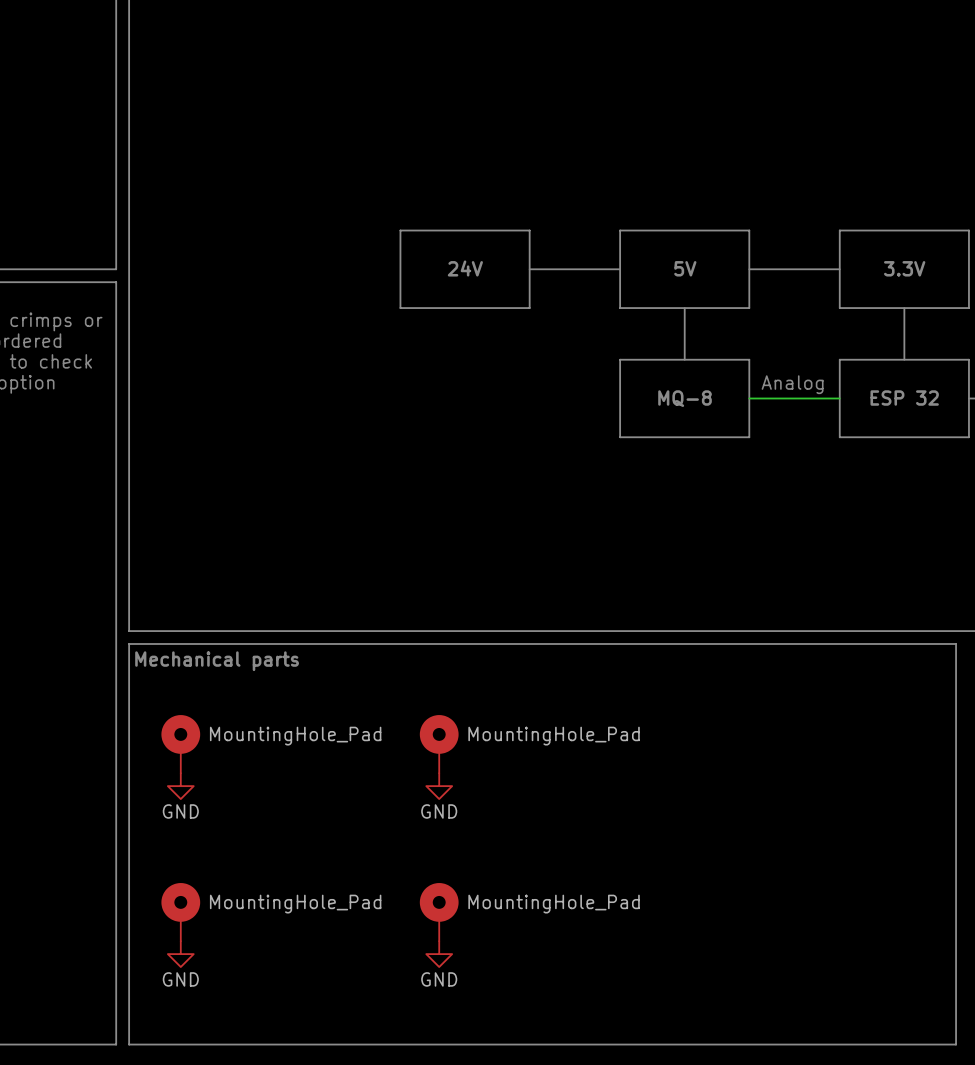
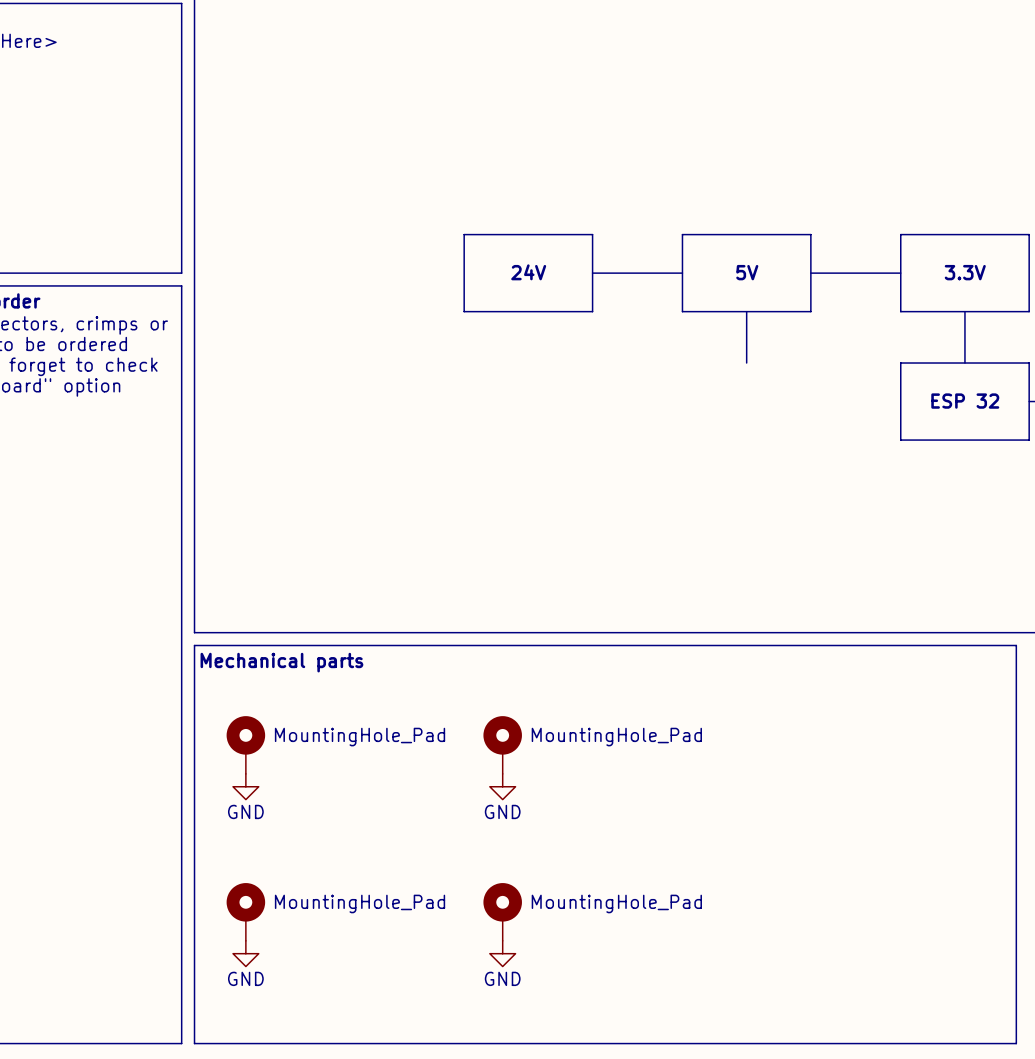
line: (620, 359) (749, 359) (749, 437) (620, 437) (620, 359) -> none
text: Analog (792, 384) -> none
text: MQ-8 (685, 398) -> none
wire: (749, 398) (839, 398) -> none

